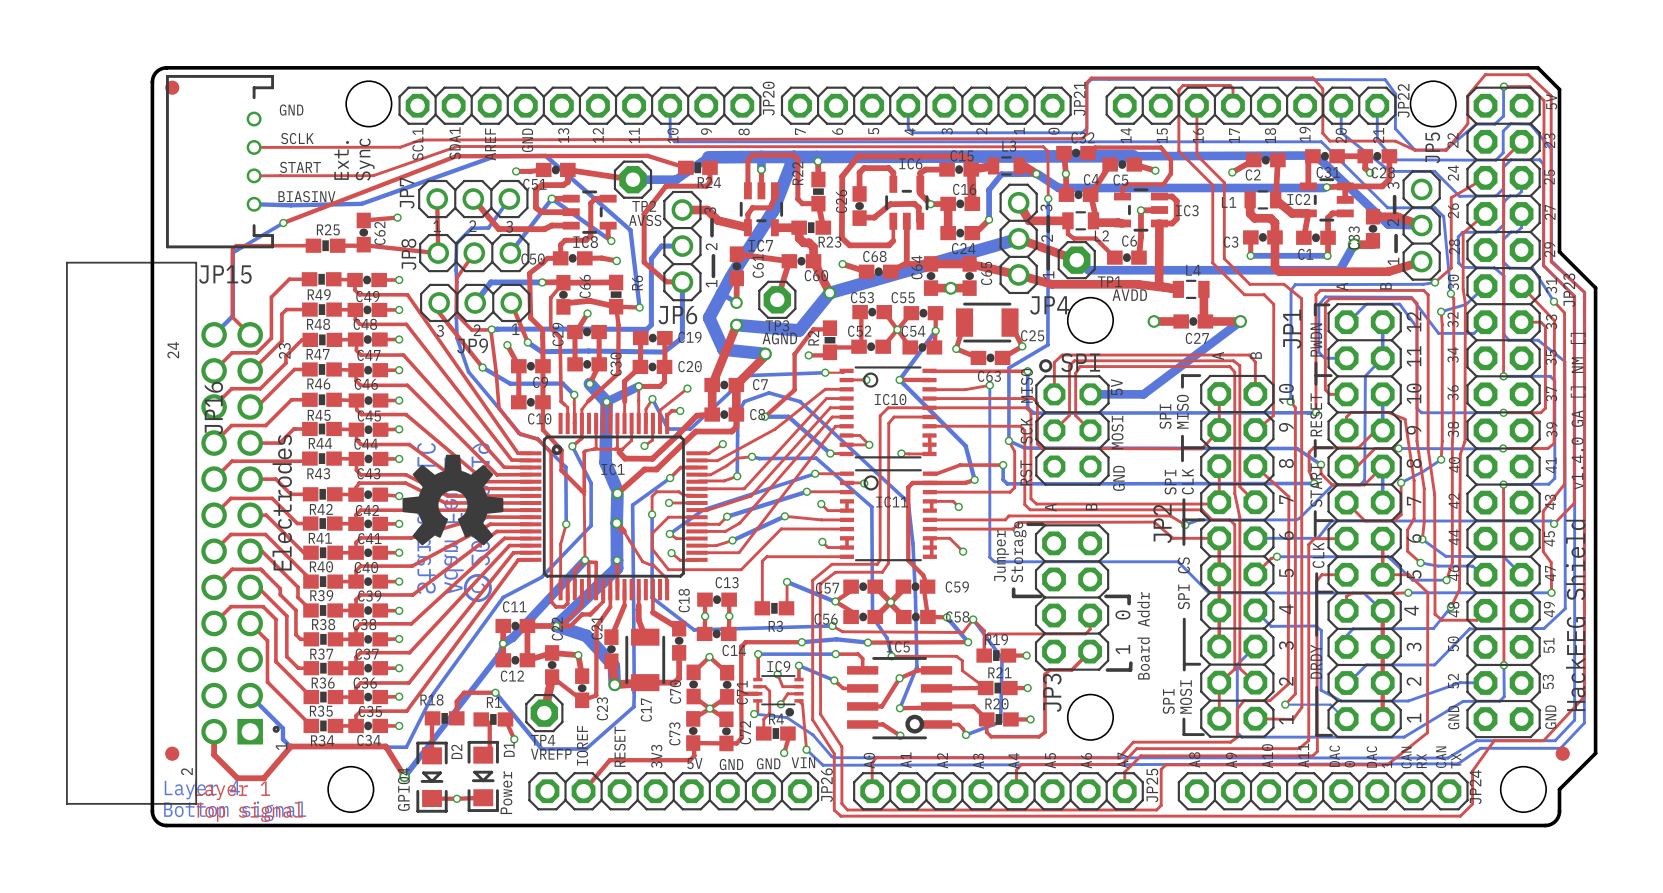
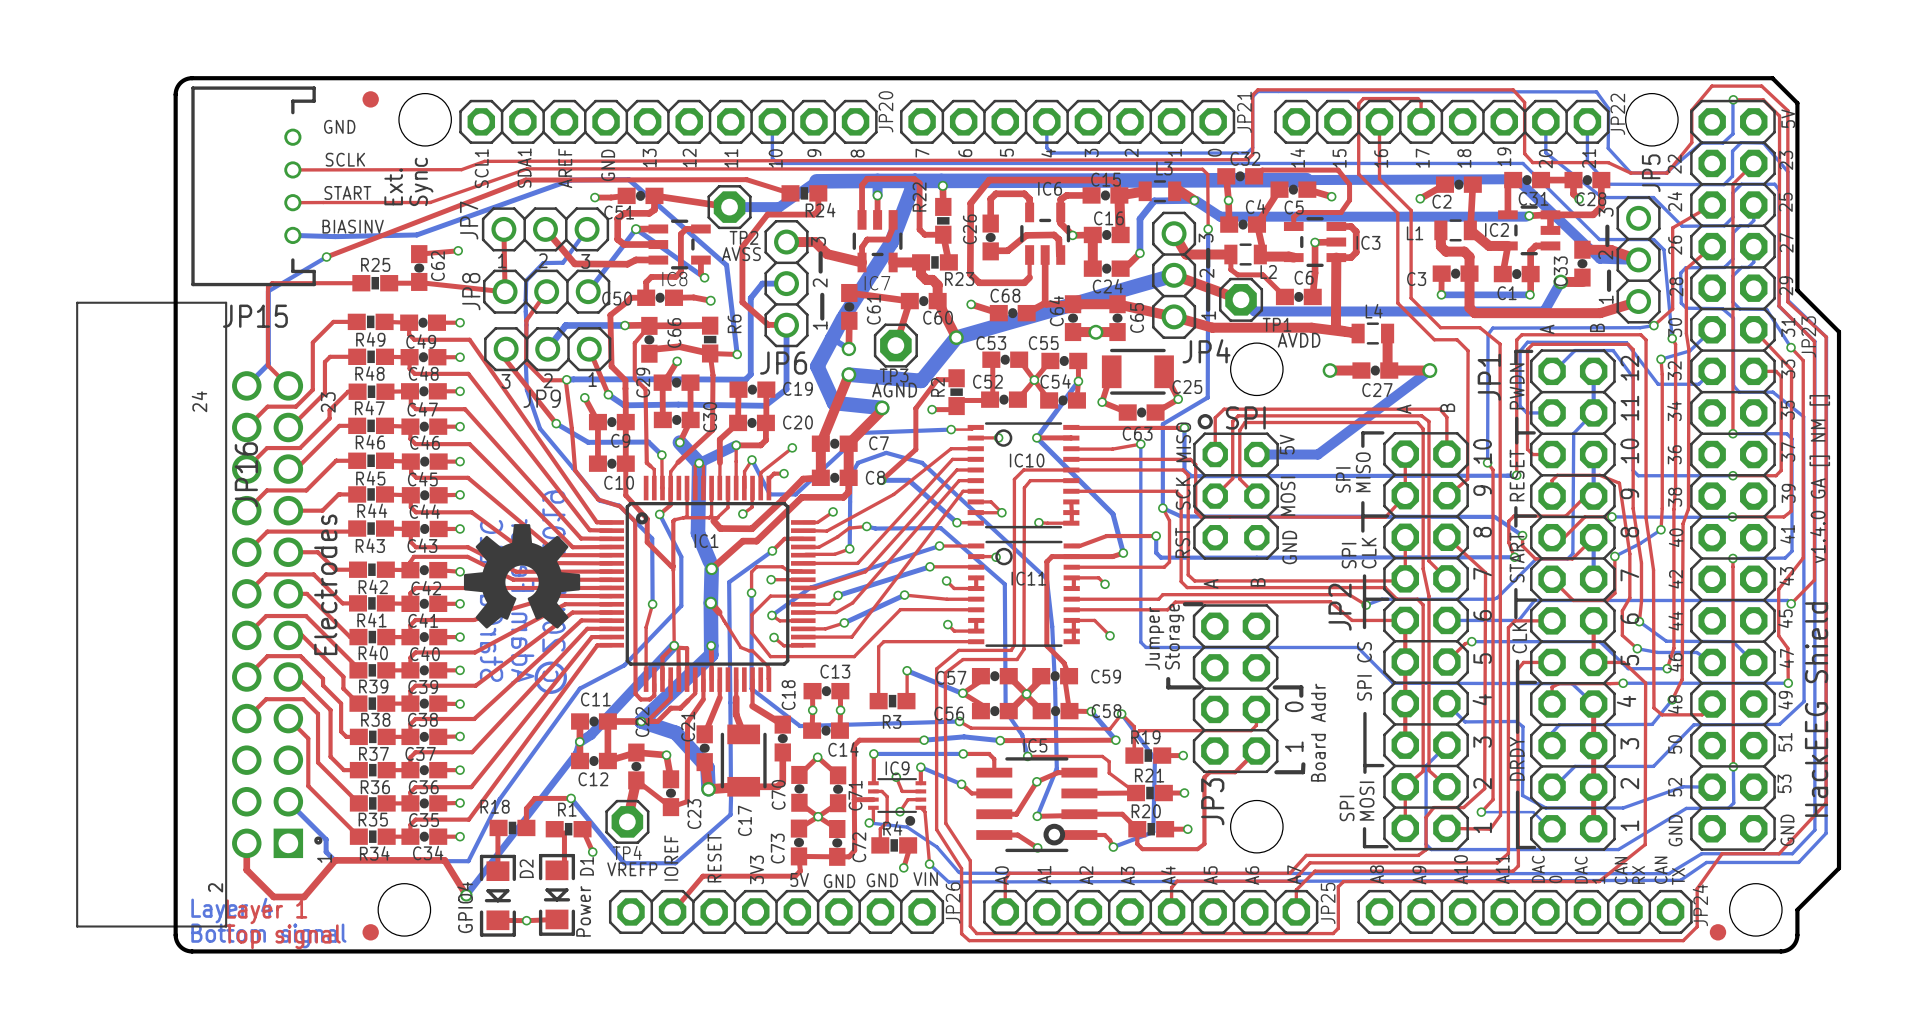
part position: (172, 87) -> (370, 99)
part position: (172, 753) -> (370, 932)
part position: (1562, 753) -> (1717, 932)

